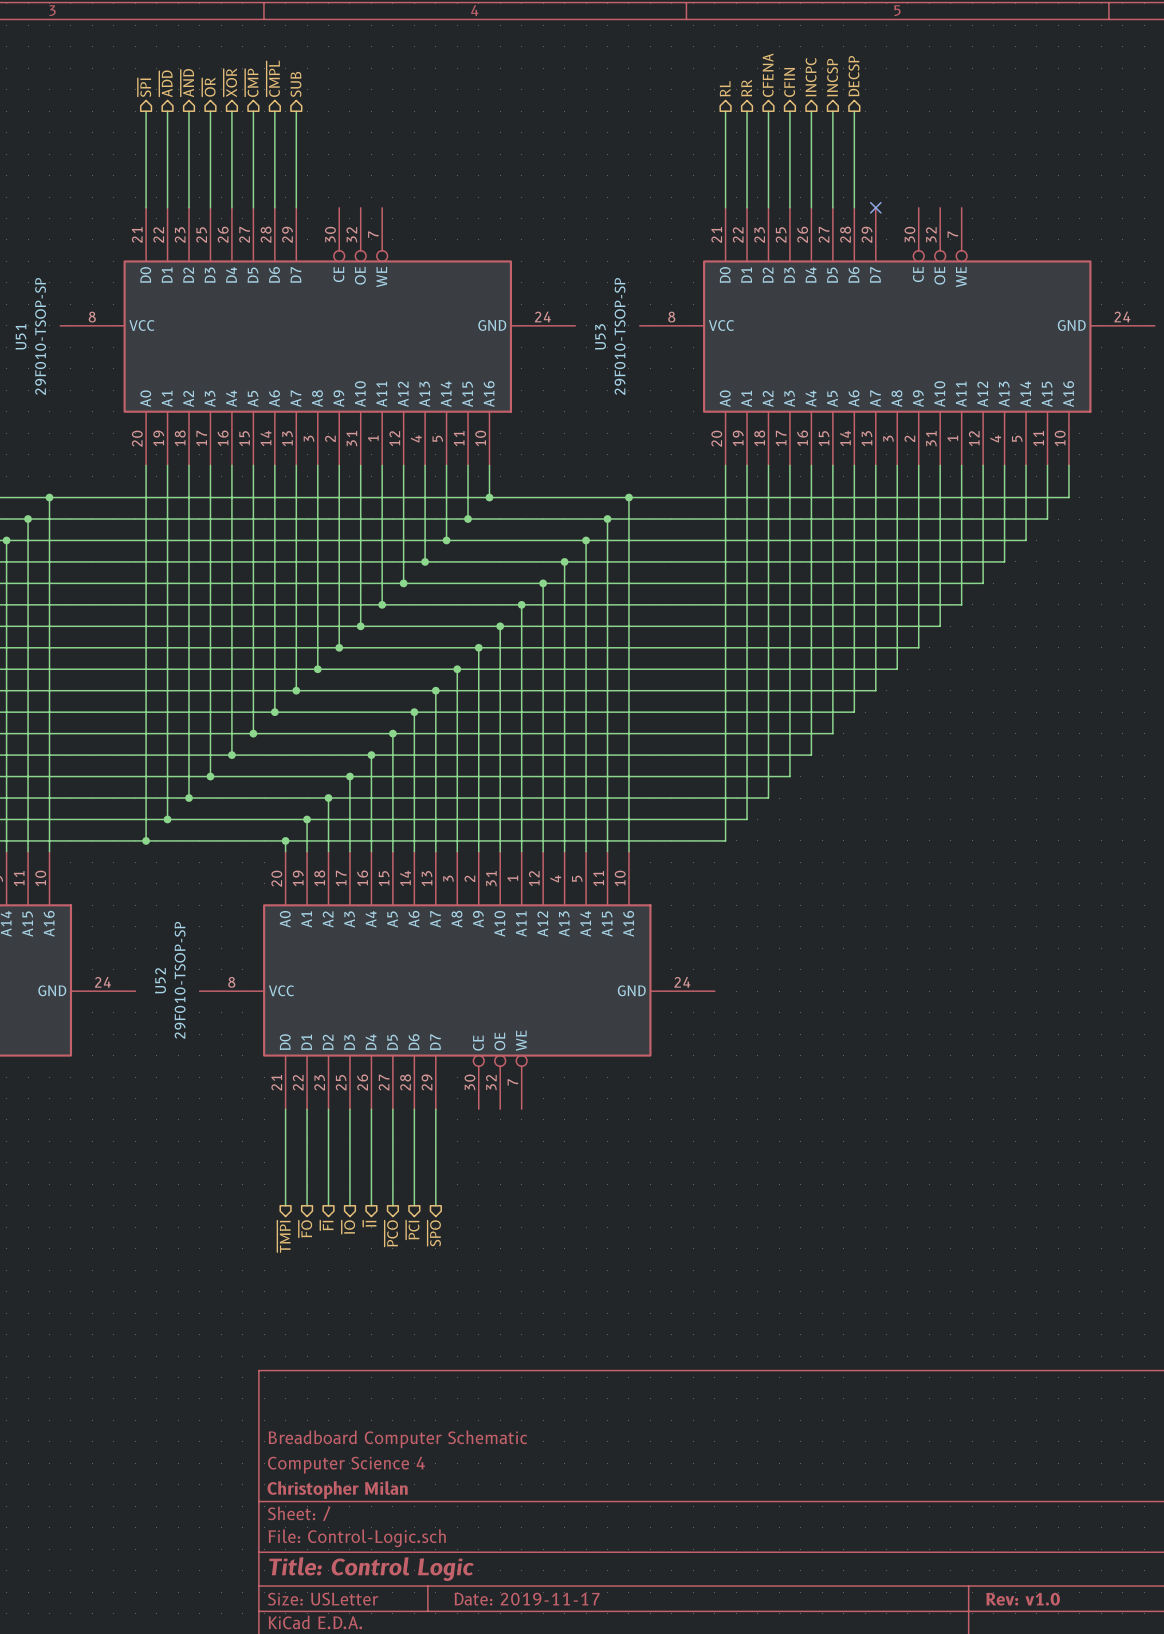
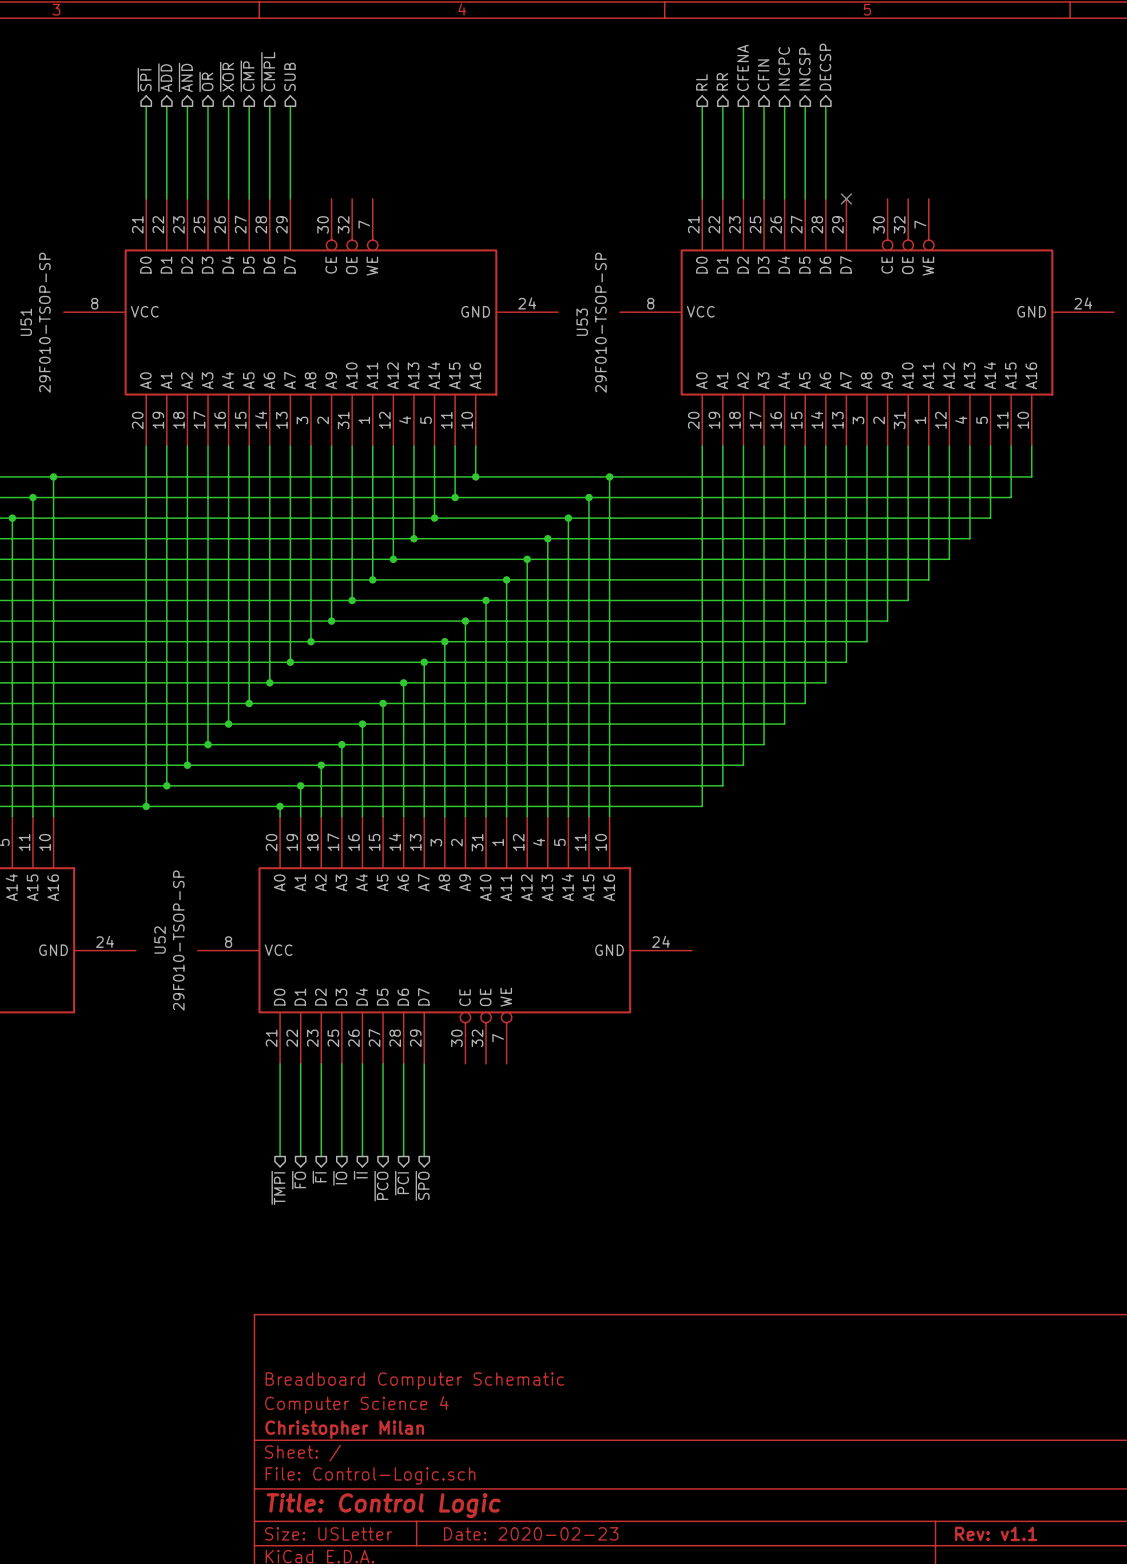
title block: Date: 2019-11-17 (527, 1599) -> Date: 2020-02-23 (531, 1533)
title block: Rev: v1.0 (1023, 1599) -> Rev: v1.1 (996, 1533)

